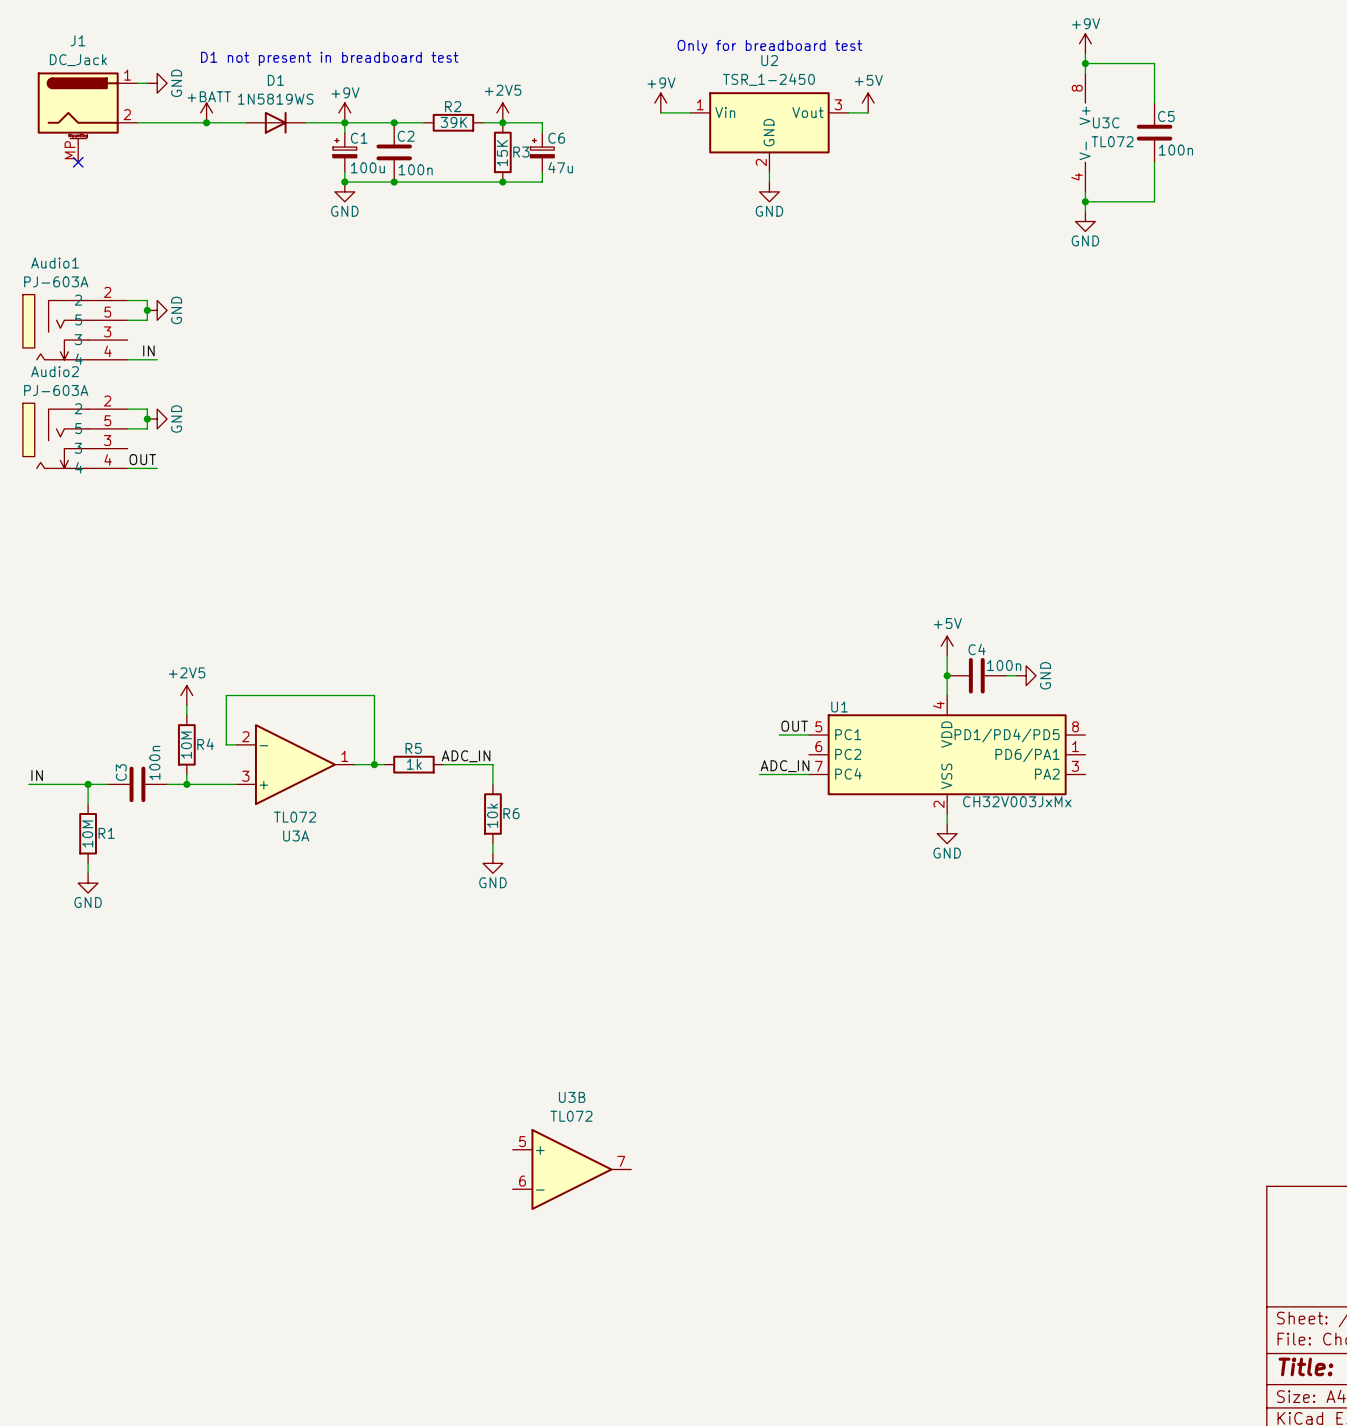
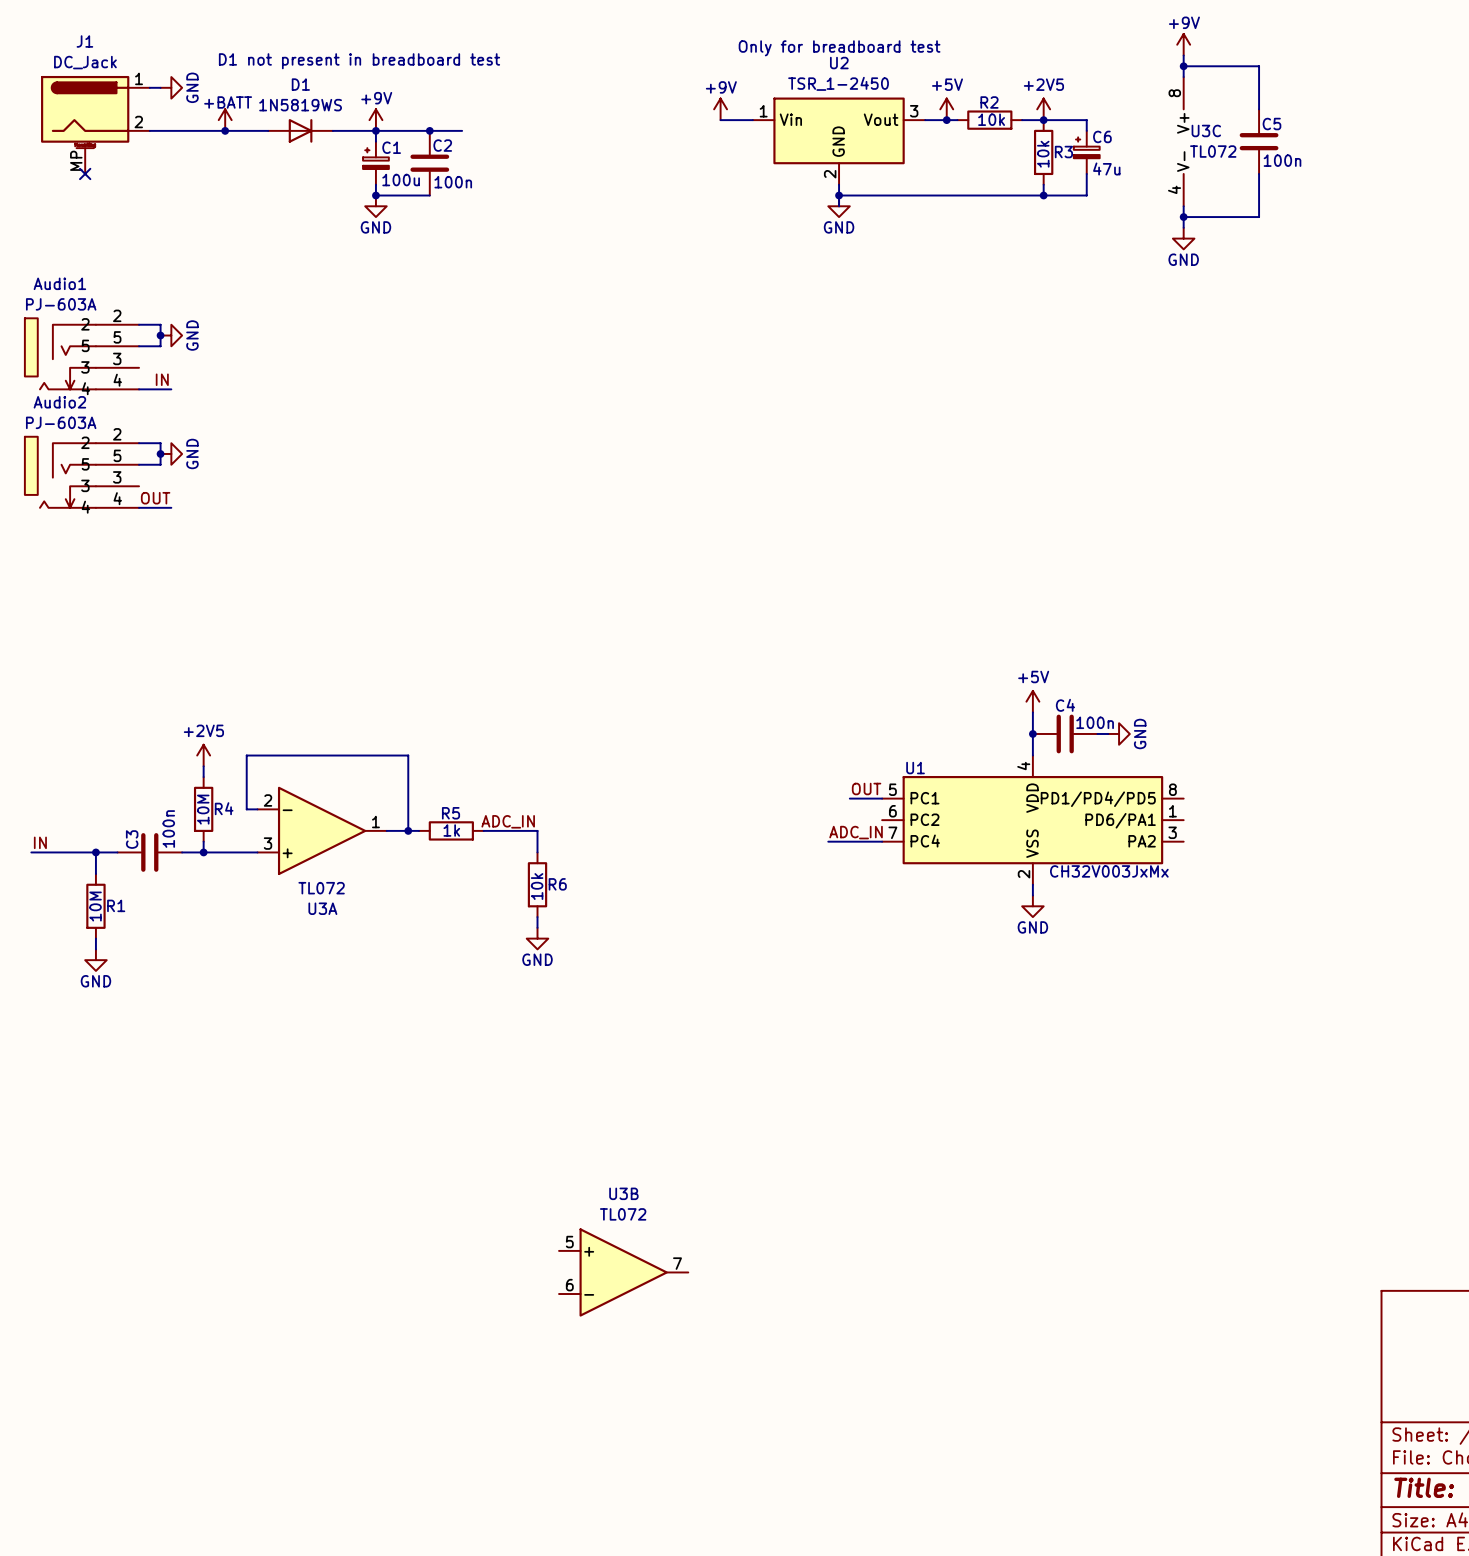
power symbol: none -> +2V5 (1043, 109)
power symbol: +2V5 (502, 112) -> none
wire: none -> (946, 120) (957, 120)
junction: none -> (946, 120)
wire: none -> (1022, 120) (1086, 120) (1086, 130)
junction: none -> (1043, 120)
R2 position: (453, 122) -> (989, 120)
R2 value: 39K (453, 122) -> 10k (991, 119)
wire: (483, 122) (542, 122) (542, 132) -> none
junction: (502, 122) -> none
R3 position: (502, 152) -> (1043, 152)
C6 position: (542, 152) -> (1086, 152)
R3 value: 15K (502, 153) -> 10k (1043, 154)
wire: none -> (1086, 173) (1086, 195) (839, 195) (839, 206)
wire: (542, 172) (542, 182) (394, 182) -> none
wire: none -> (1043, 184) (1043, 195)
junction: (394, 182) -> none
junction: (502, 182) -> none
junction: none -> (839, 195)
junction: none -> (1043, 195)

